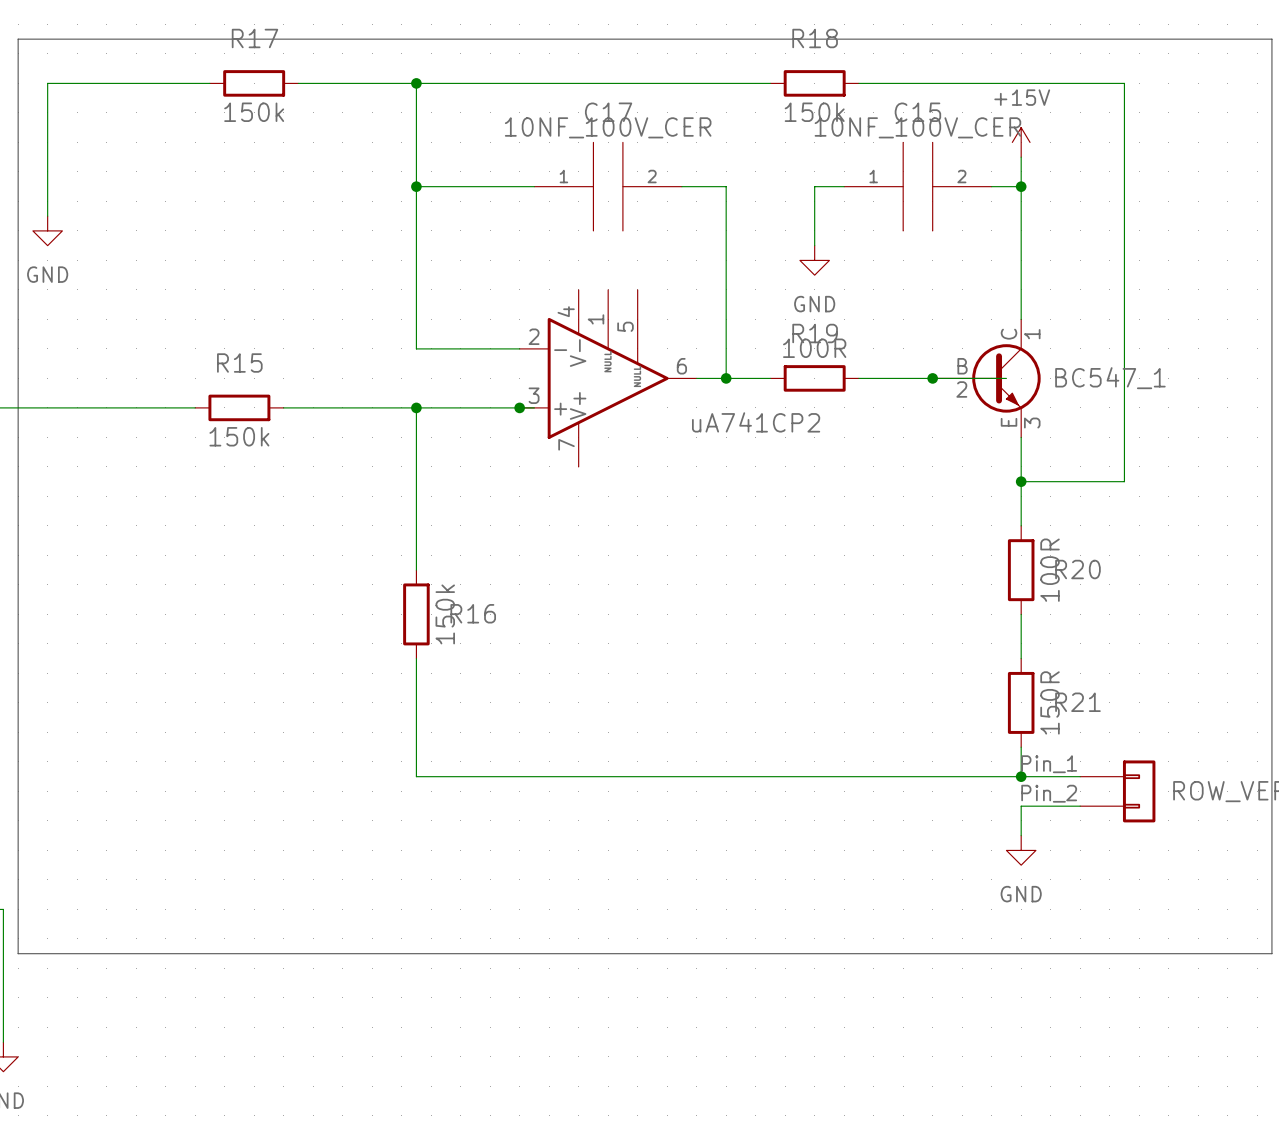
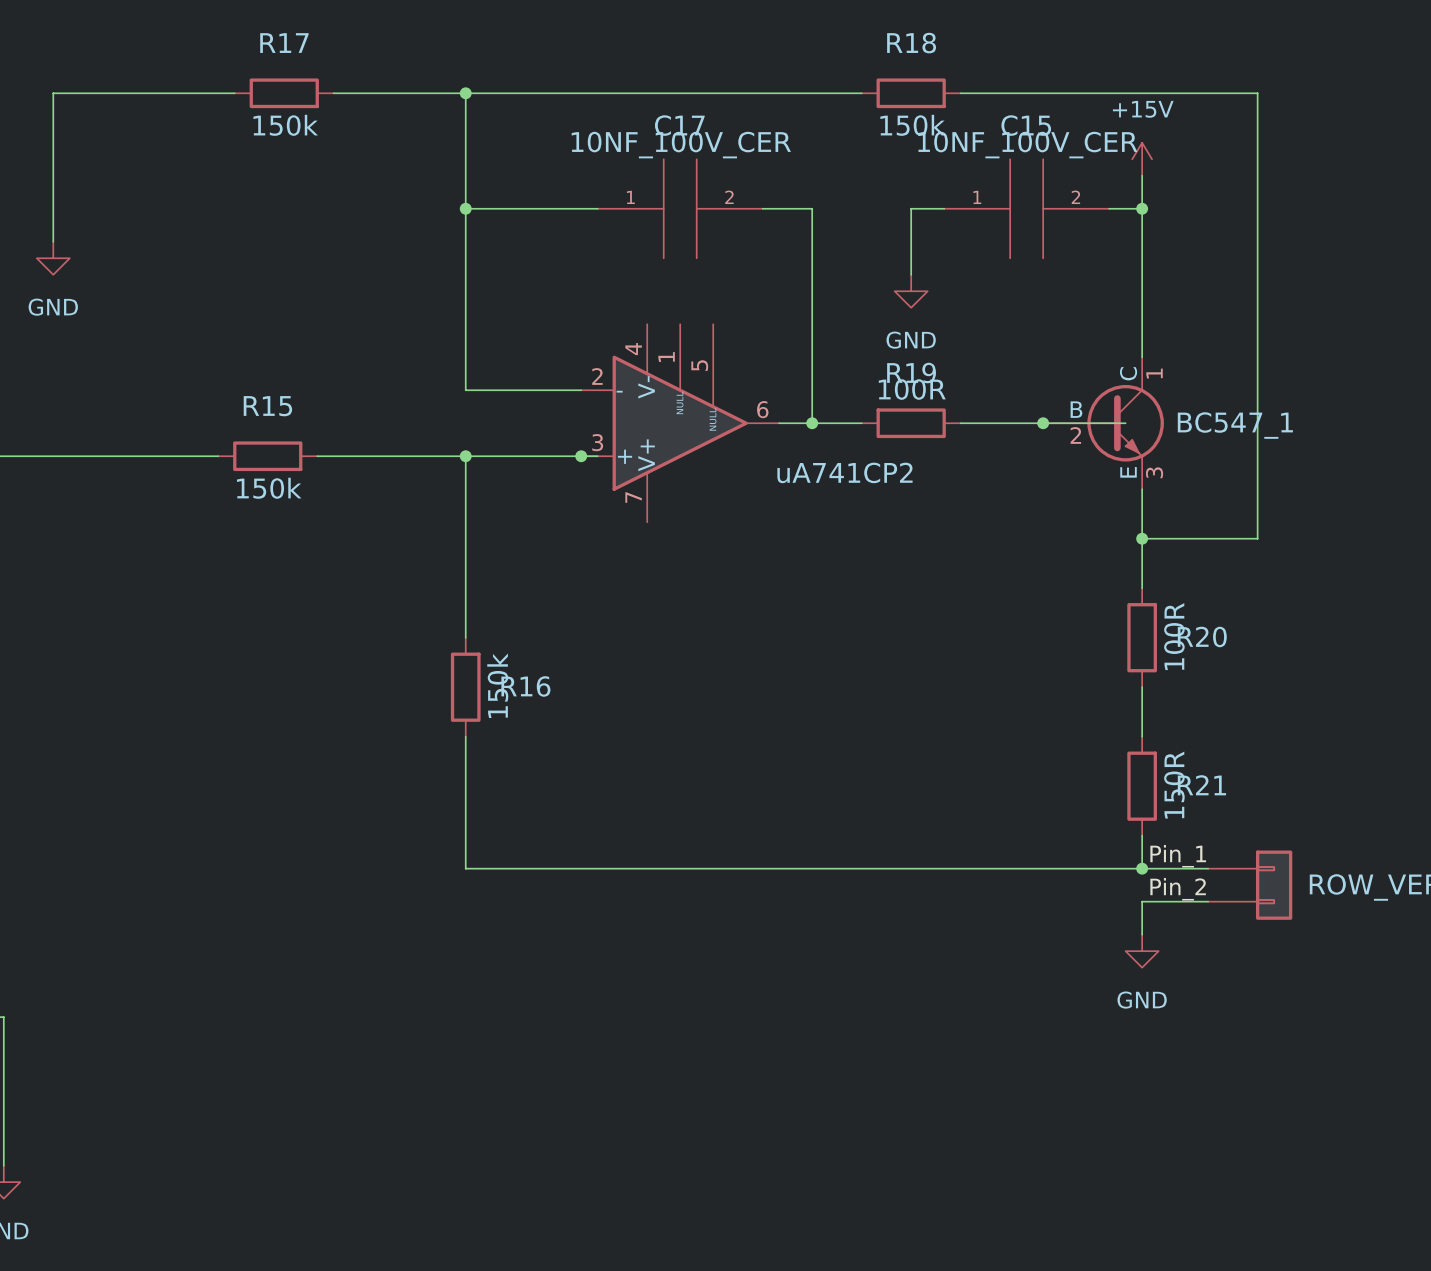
line: (18, 39) (1271, 39) (1271, 953) (18, 953) (18, 39) -> none

